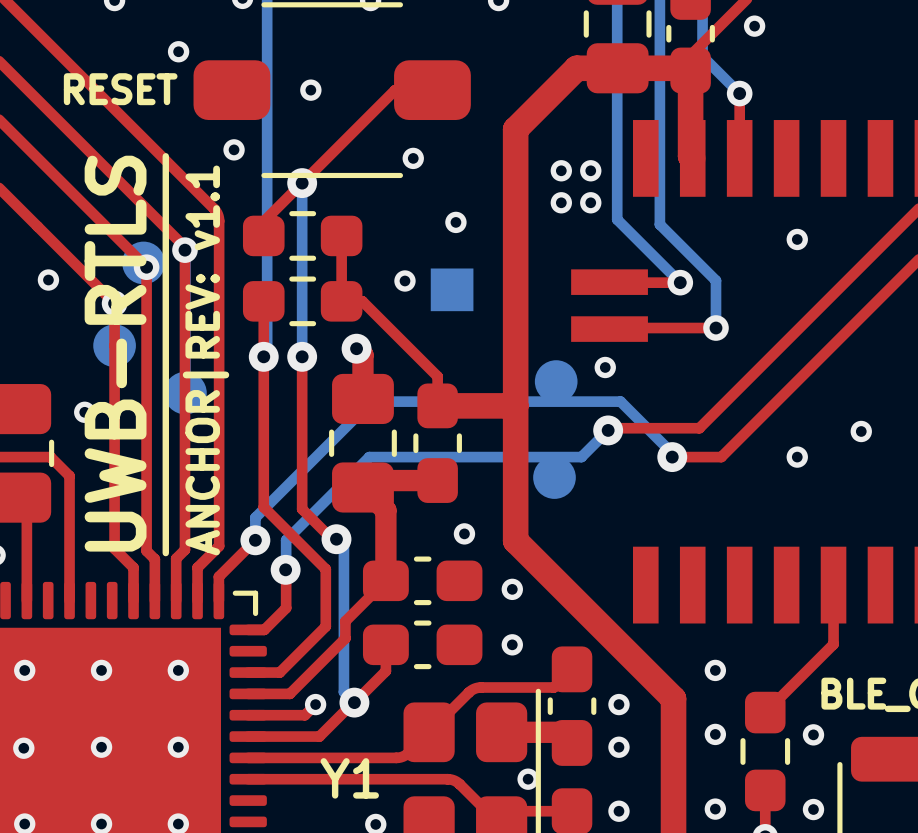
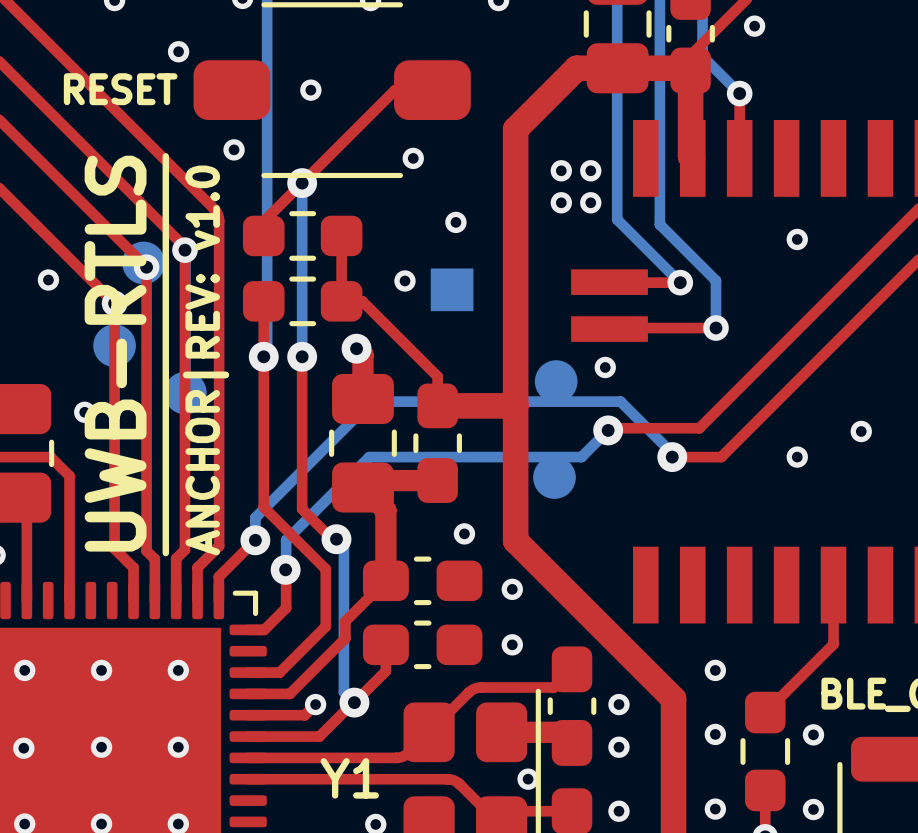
text: ANCHOR|REV: v1.1 (206, 360) -> ANCHOR|REV: v1.0 (206, 360)

